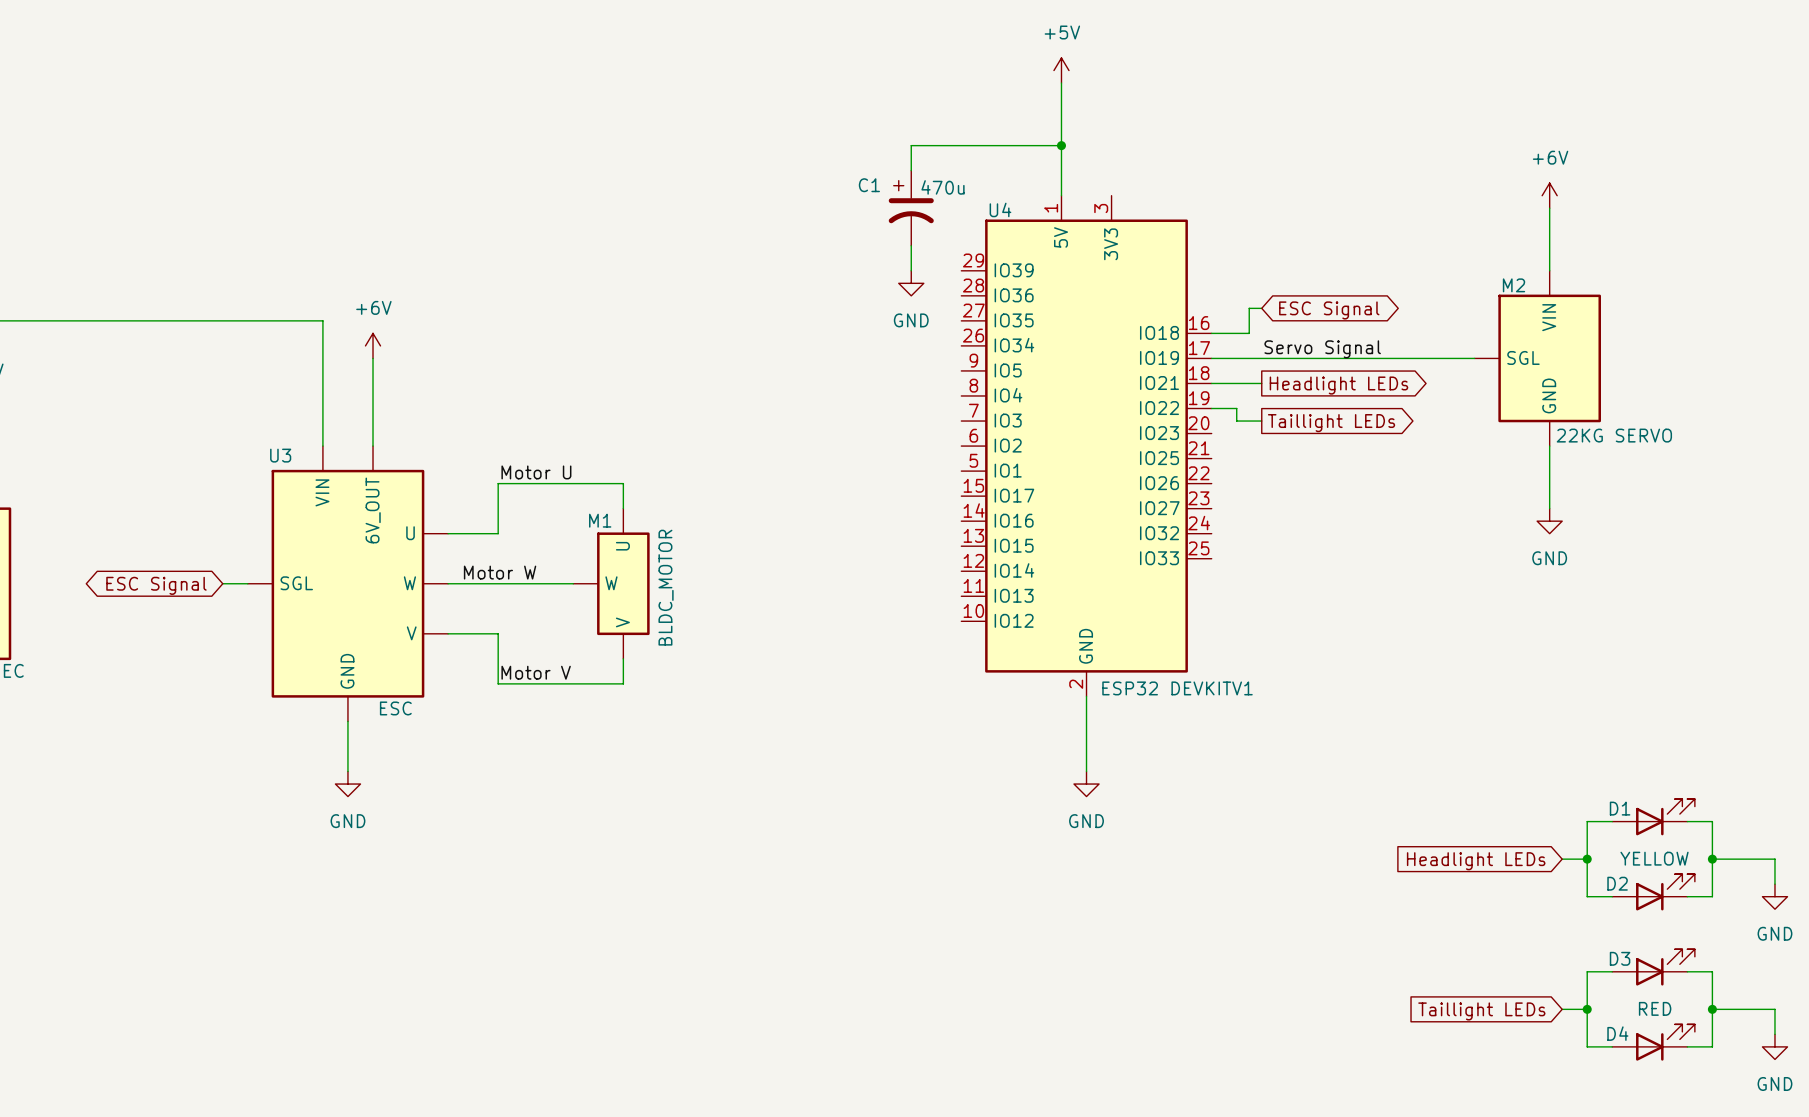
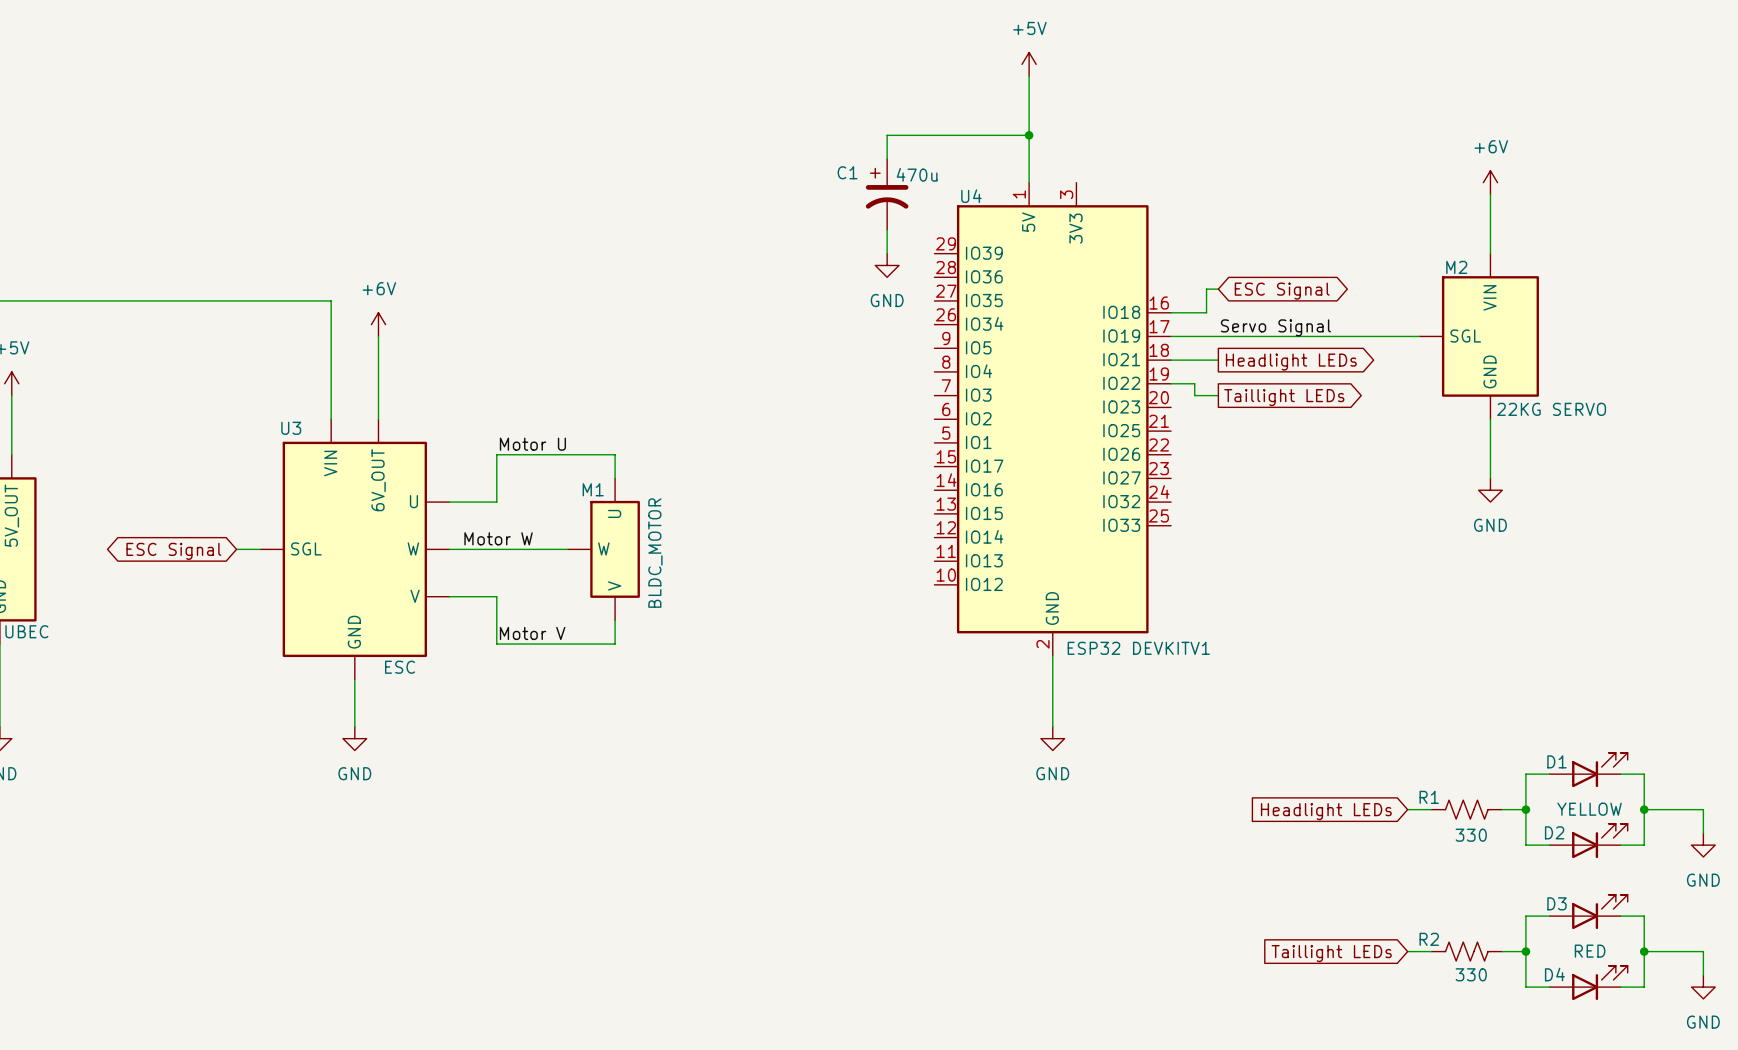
wire: none -> (1407, 809) (1431, 809)
R1: none -> 330 (1466, 809)
global label position: Headlight LEDs (1476, 861) -> Headlight LEDs (1326, 811)
wire: none -> (1407, 951) (1431, 951)
R2: none -> 330 (1466, 951)
global label position: Taillight LEDs (1481, 1011) -> Taillight LEDs (1331, 953)

